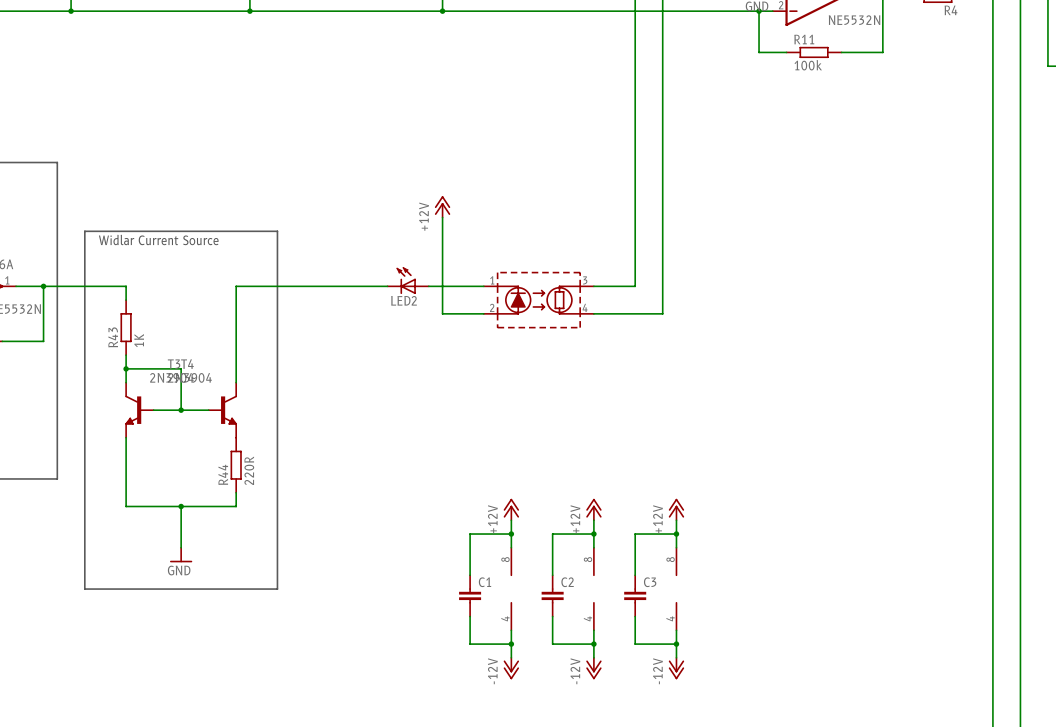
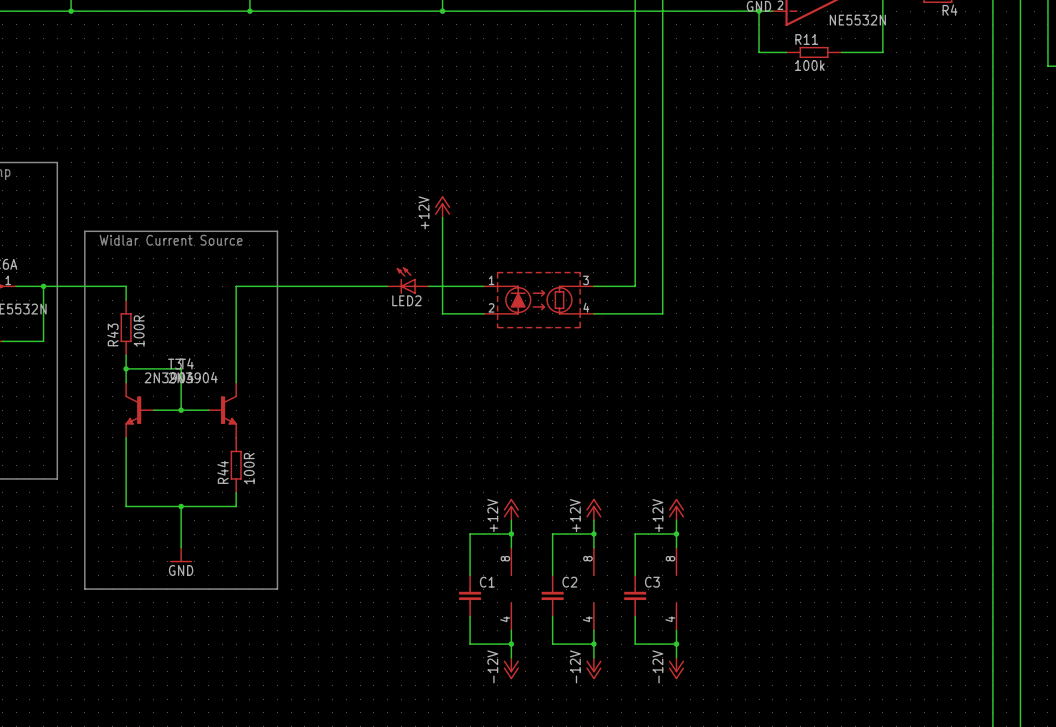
R43 value: 1K (139, 340) -> 100R (139, 331)
R44 value: 220R (249, 470) -> 100R (249, 468)

